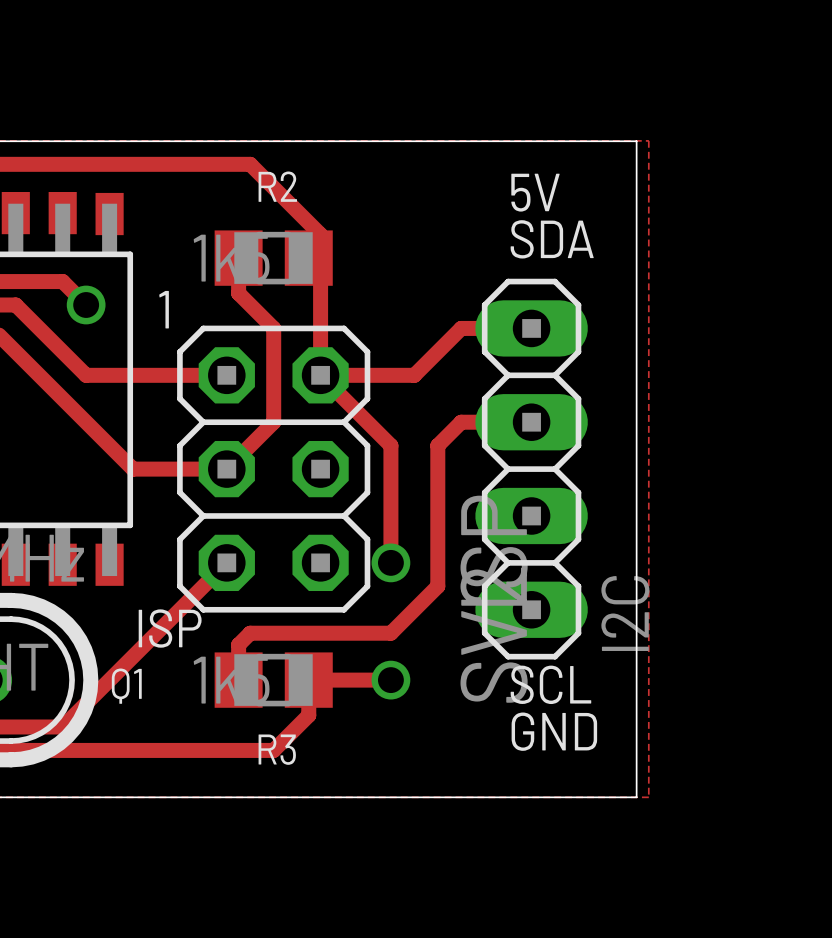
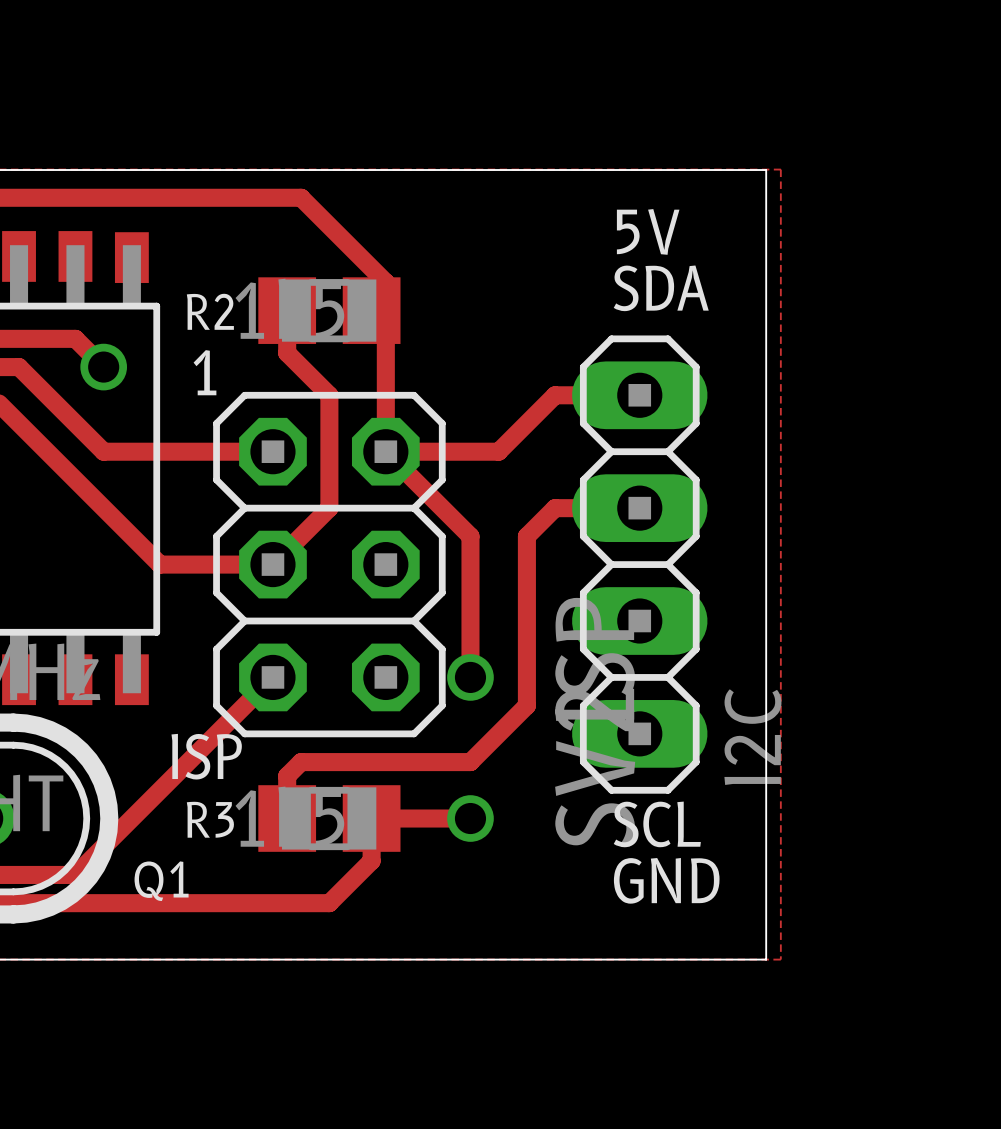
R2 name position: R2 (277, 186) -> R2 (210, 311)
Q1 name position: Q1 (126, 686) -> Q1 (161, 881)
R3 name position: R3 (277, 749) -> R3 (210, 819)

